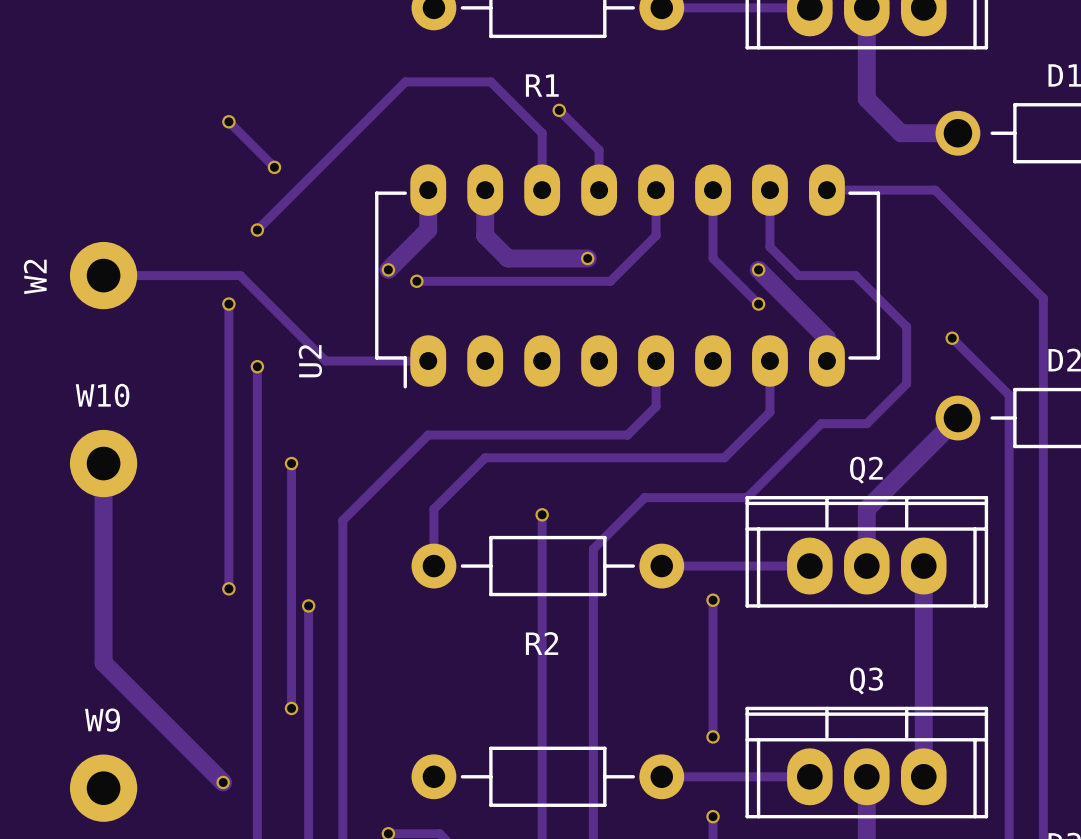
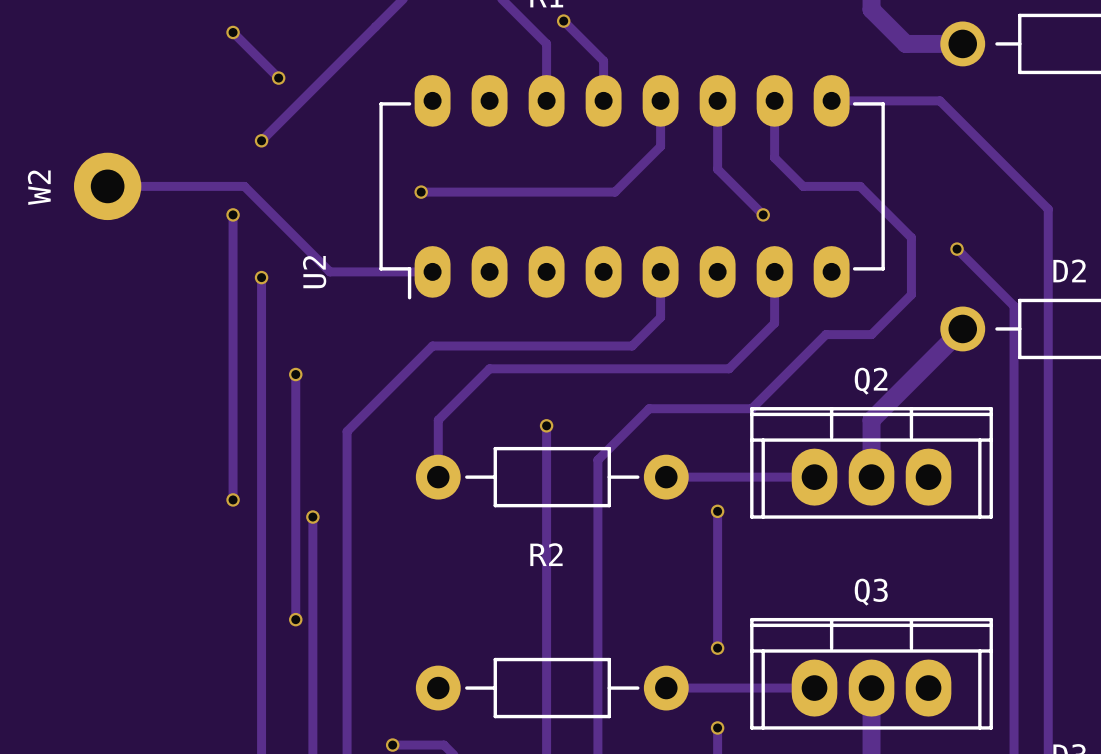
track: (428, 190) (428, 230) (388, 269) -> none
track: (485, 190) (485, 235) (507, 258) (587, 258) -> none
via: (587, 258) -> none
via: (388, 269) -> none
track: (758, 269) (826, 338) (826, 361) -> none
via: (758, 269) -> none
track: (103, 463) (103, 662) (223, 782) -> none
W10: (103, 463) -> none
track: (923, 566) (923, 776) -> none
via: (223, 782) -> none
W9: (103, 788) -> none

